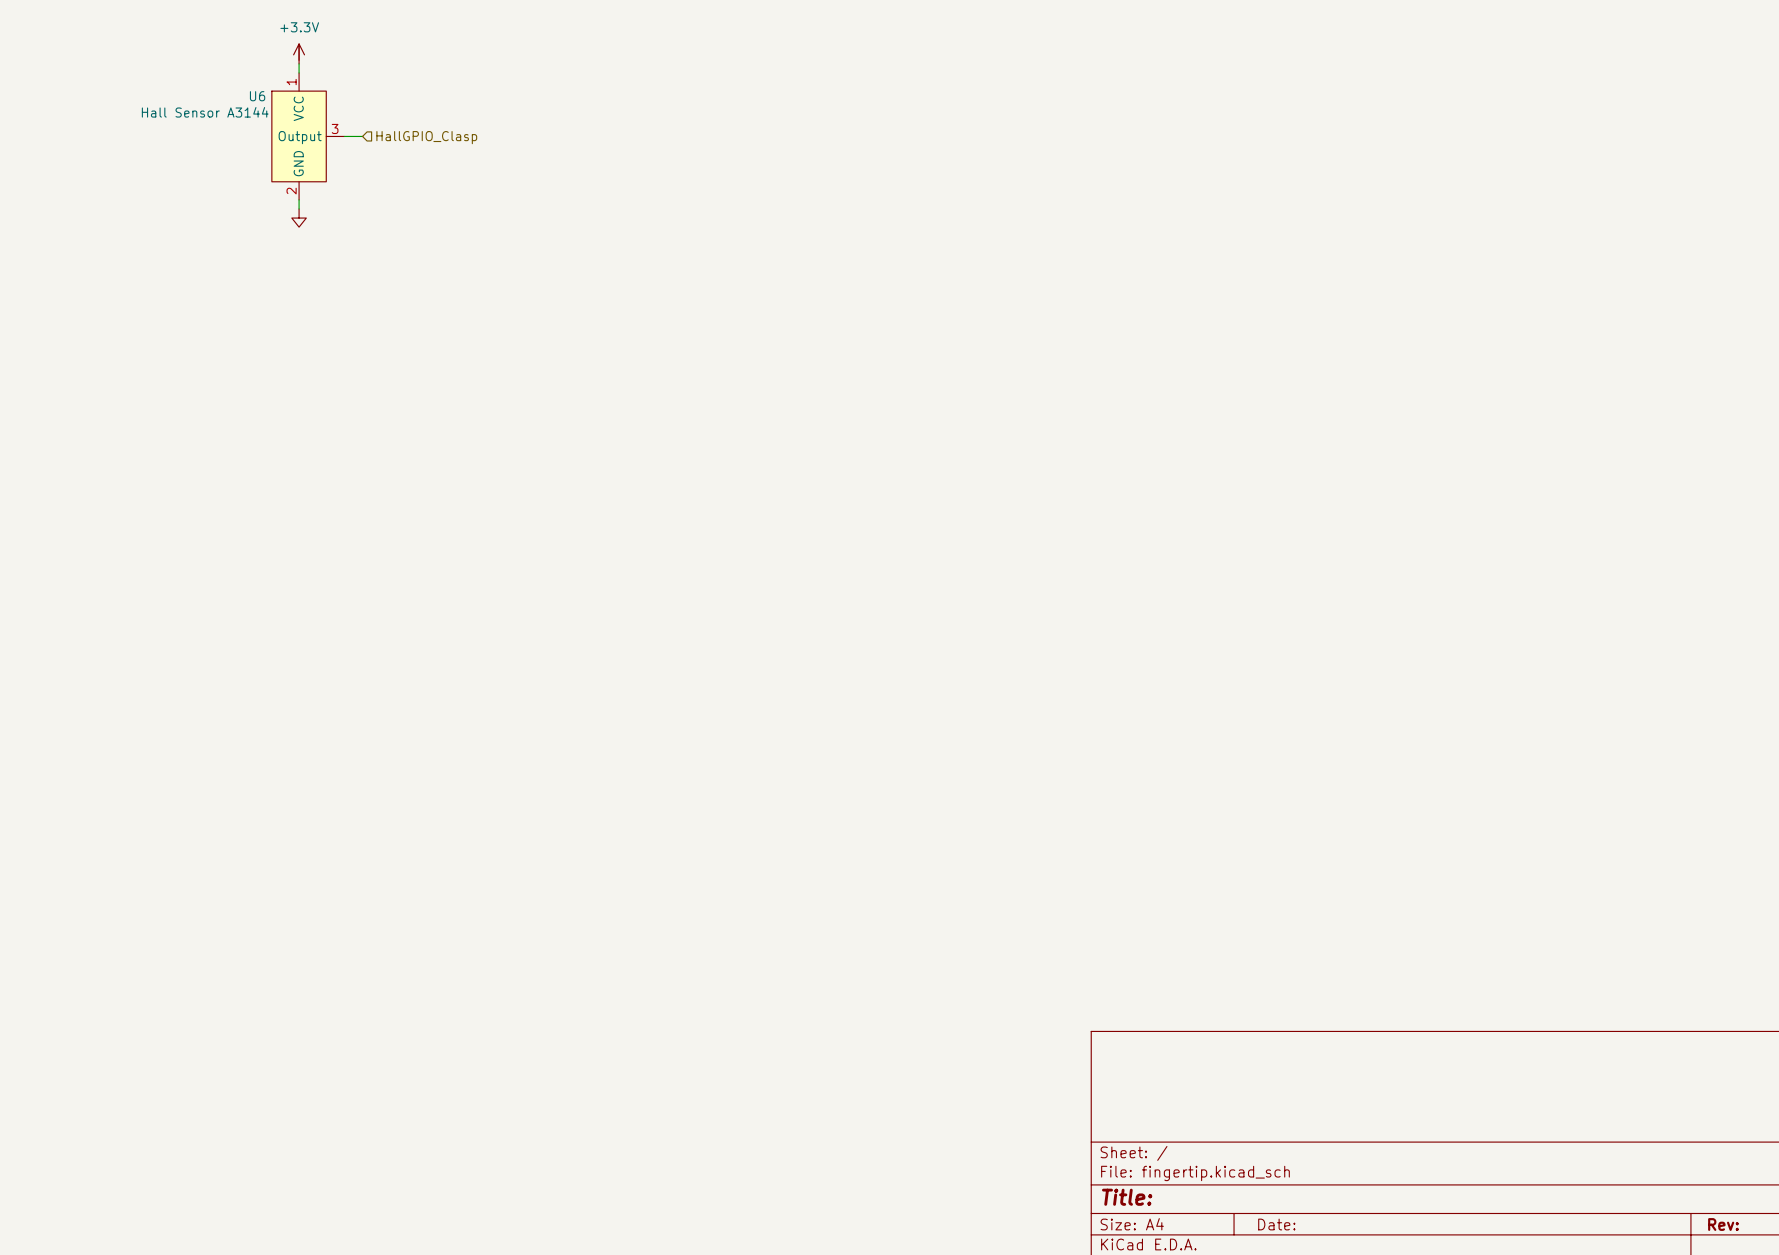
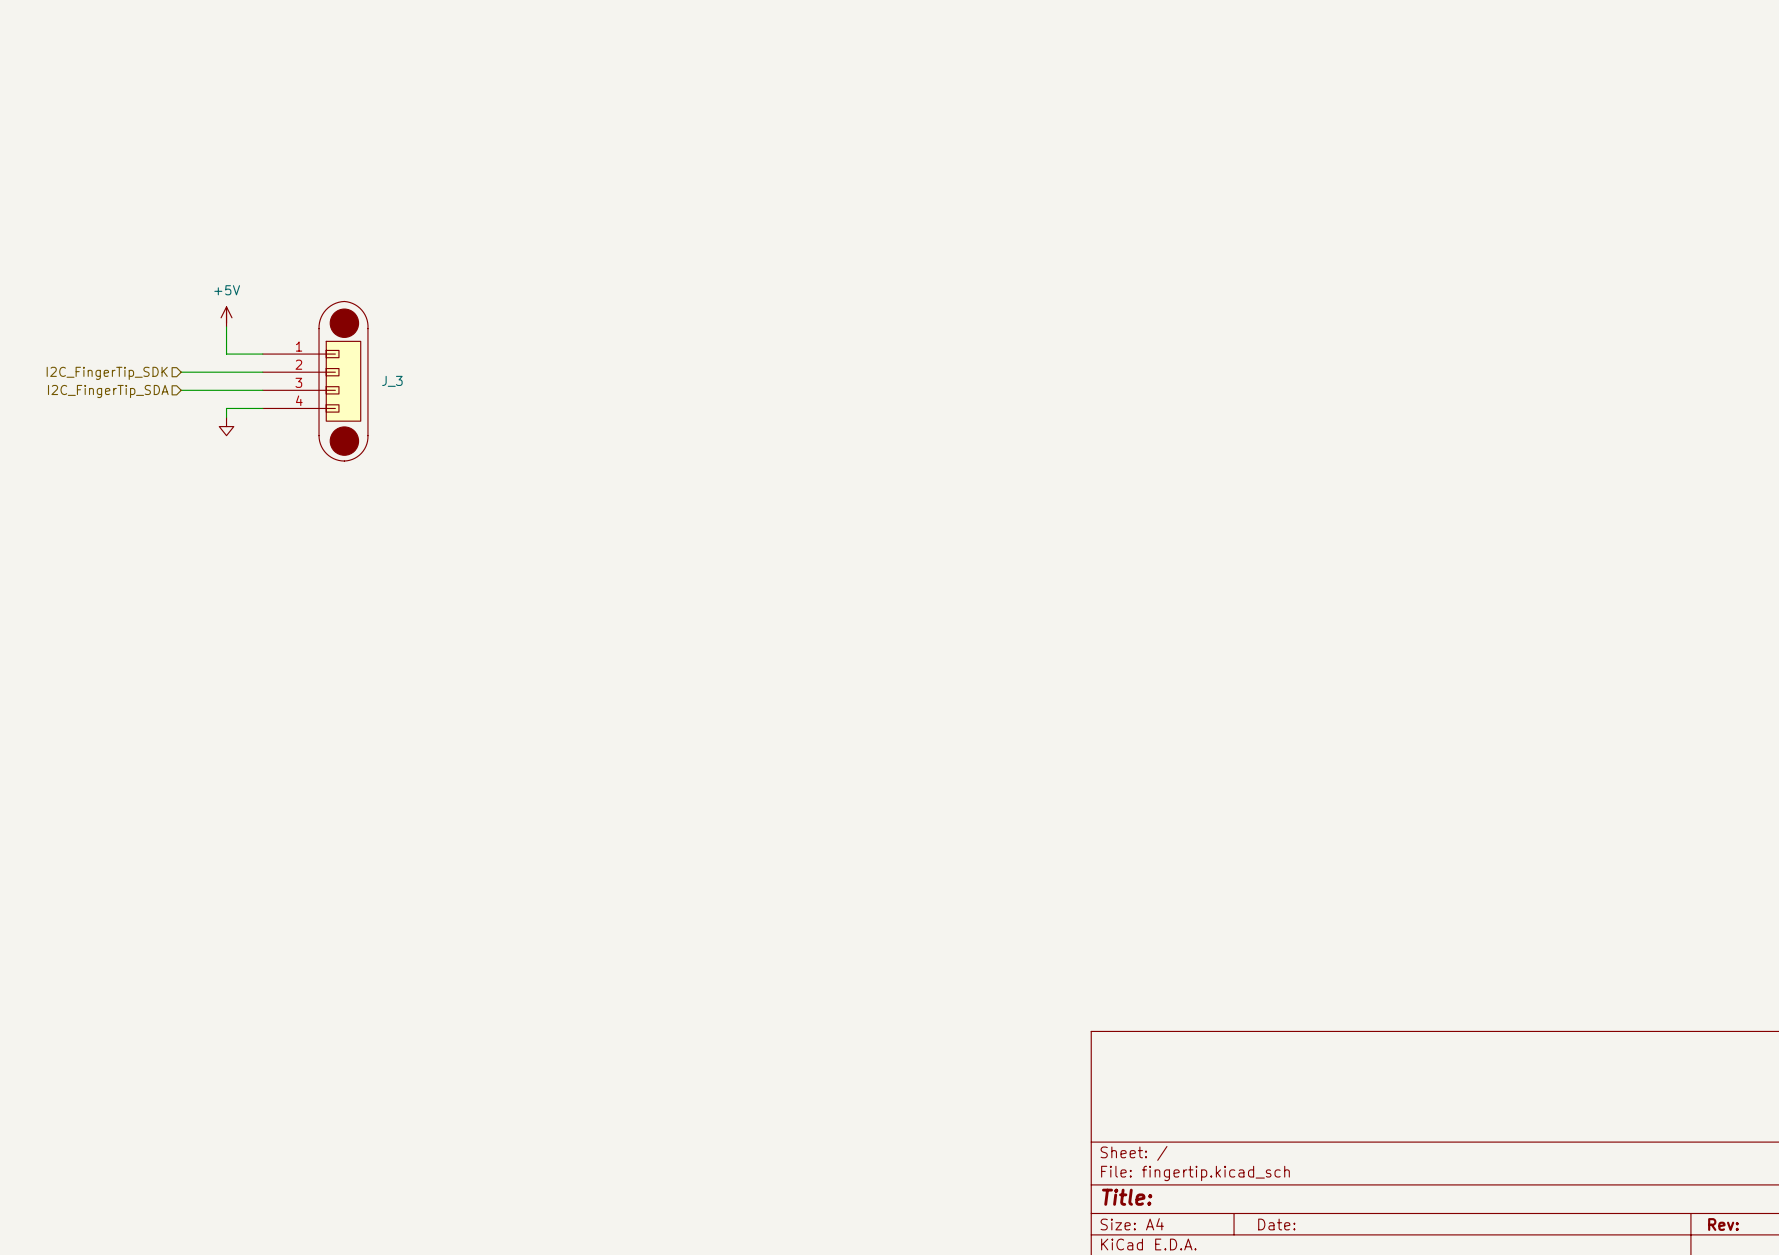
power symbol: +3.3V (299, 53) -> none
wire: (299, 63) (299, 72) -> none
U6: Hall Sensor A3144 (308, 136) -> none
wire: (344, 136) (362, 136) -> none
hierarchical label: HallGPIO_Clasp (426, 137) -> none
wire: (299, 199) (299, 208) -> none
power symbol: (299, 218) -> none
power symbol: none -> +5V (226, 316)
wire: none -> (226, 326) (226, 354) (262, 354)
wire: none -> (181, 372) (262, 372)
hierarchical label: none -> I2C_FingerTip_SDK (107, 373)
J_3: none -> (315, 381)
wire: none -> (181, 390) (262, 390)
hierarchical label: none -> I2C_FingerTip_SDA (108, 391)
wire: none -> (262, 408) (226, 408) (226, 417)
power symbol: none -> (226, 426)

